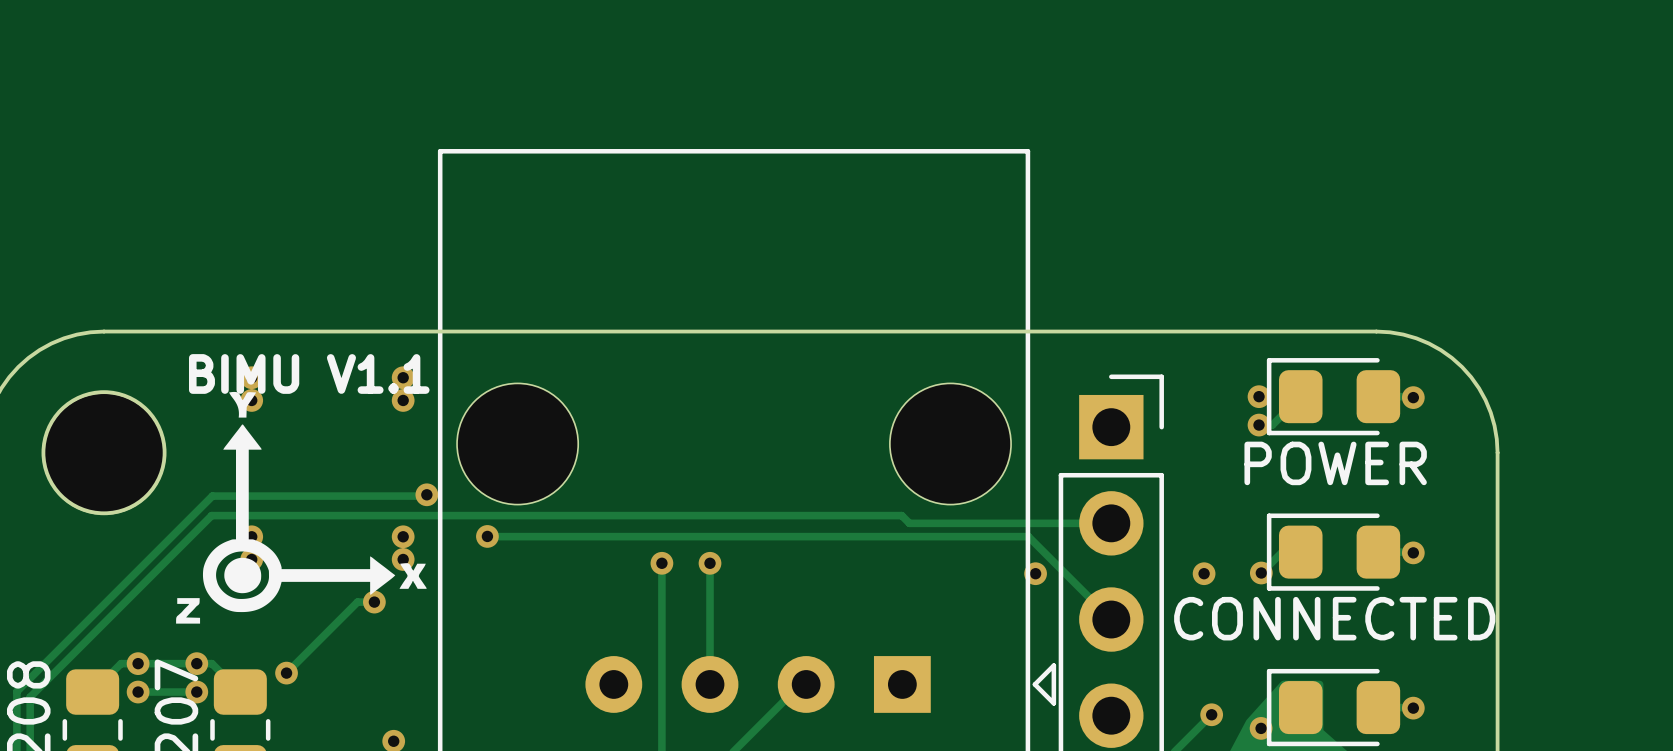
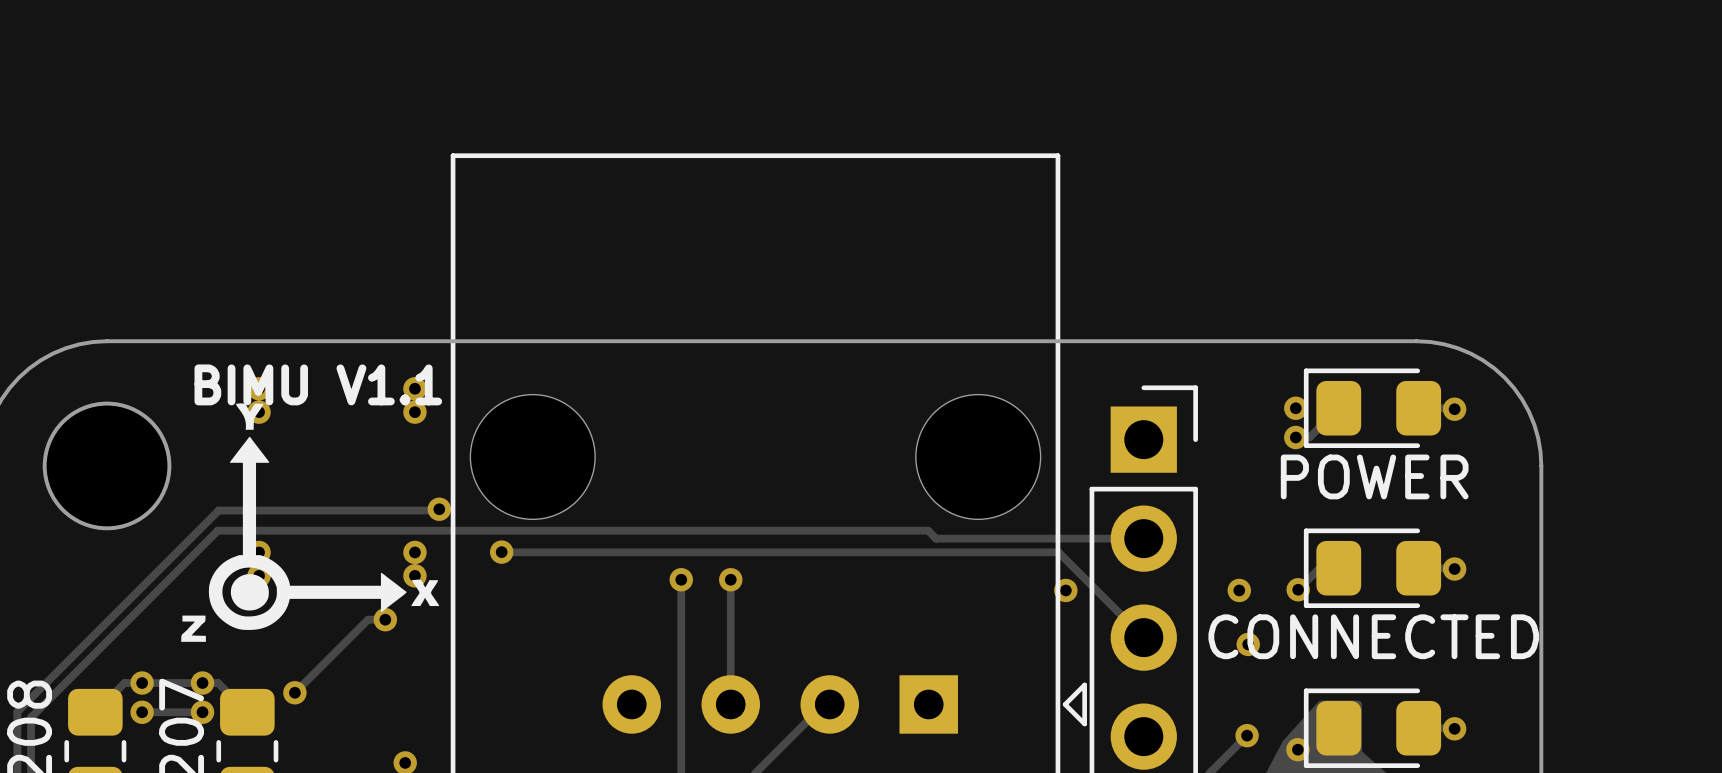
via: none -> (1248, 644)

